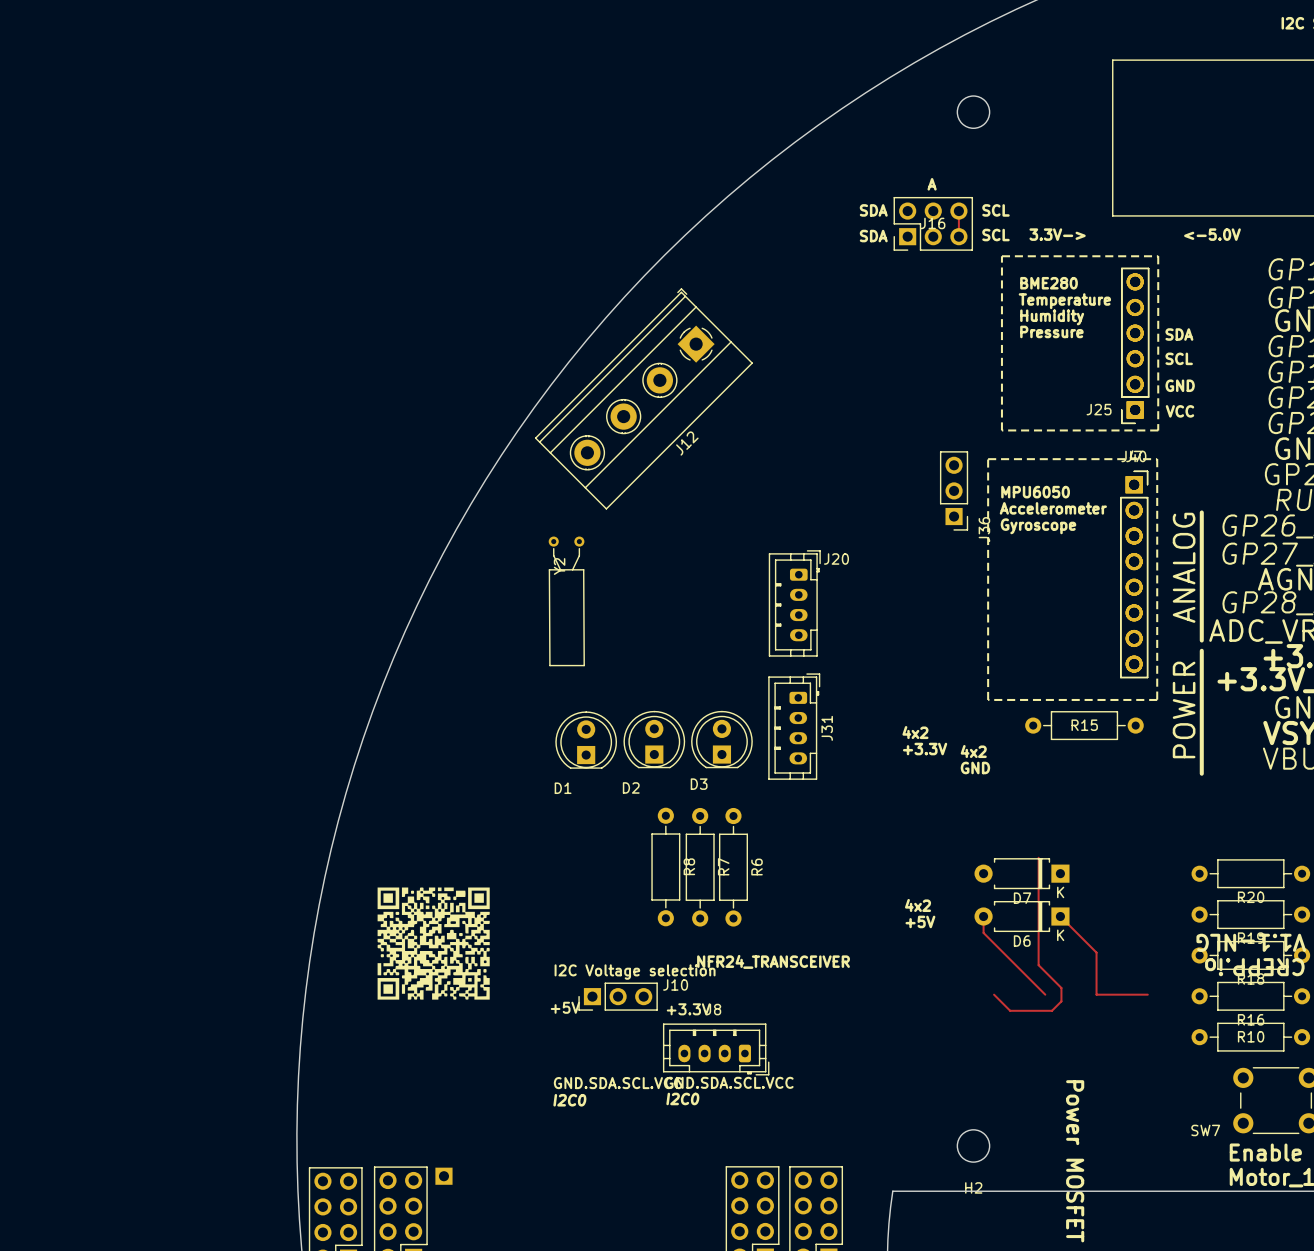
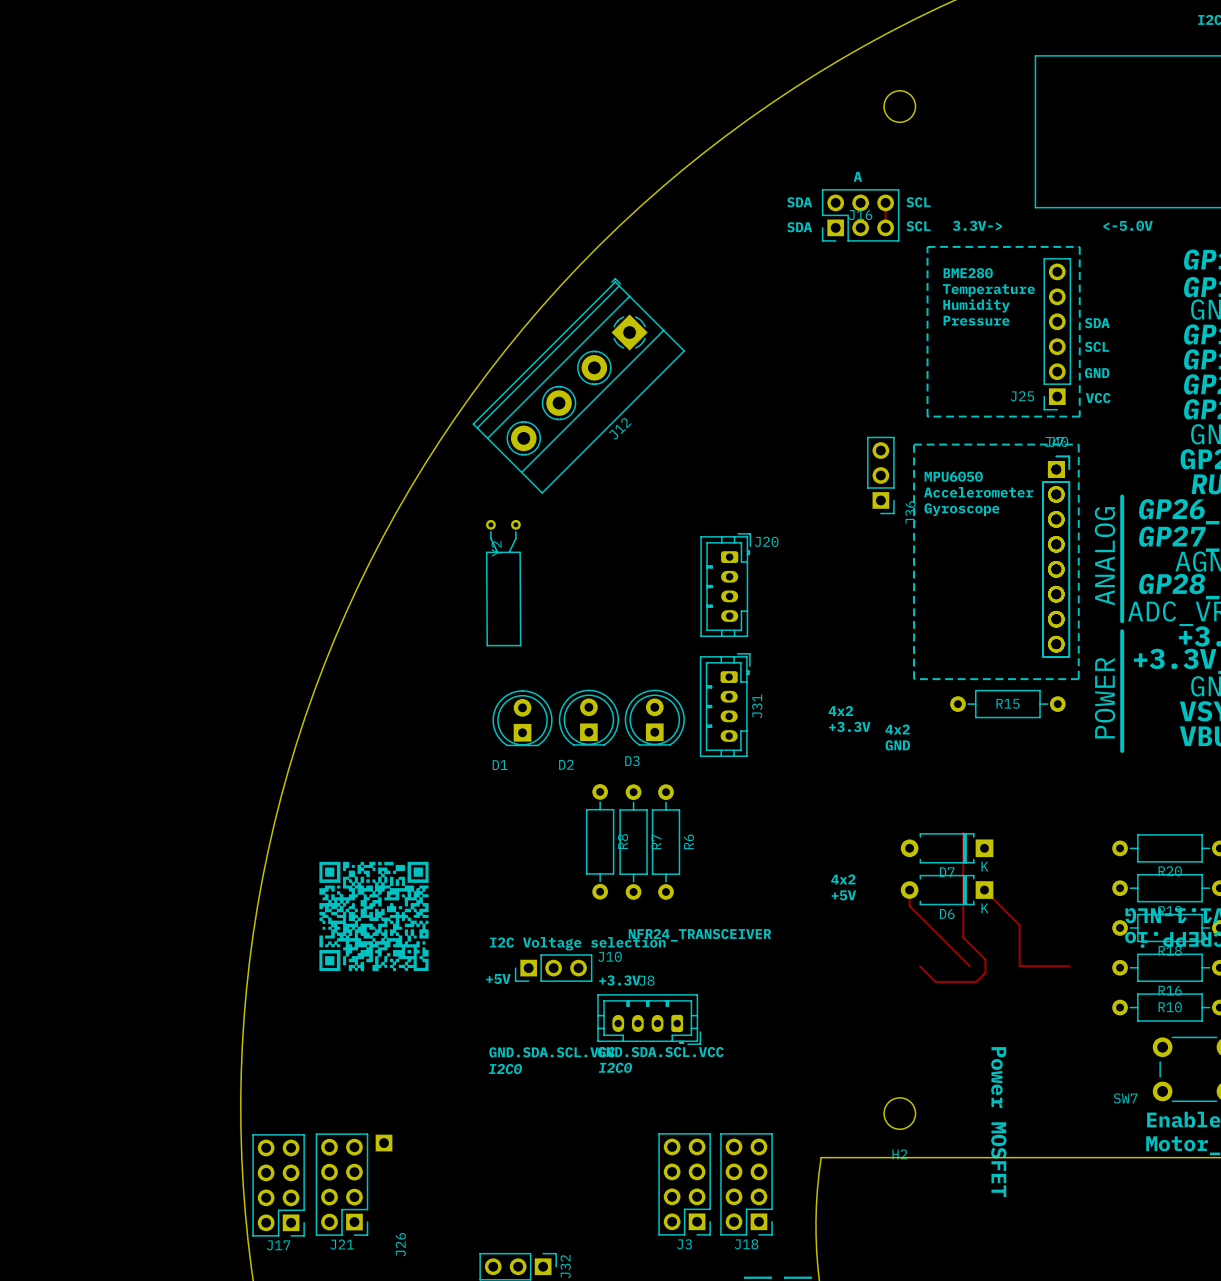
part: (1135, 345) -> none

